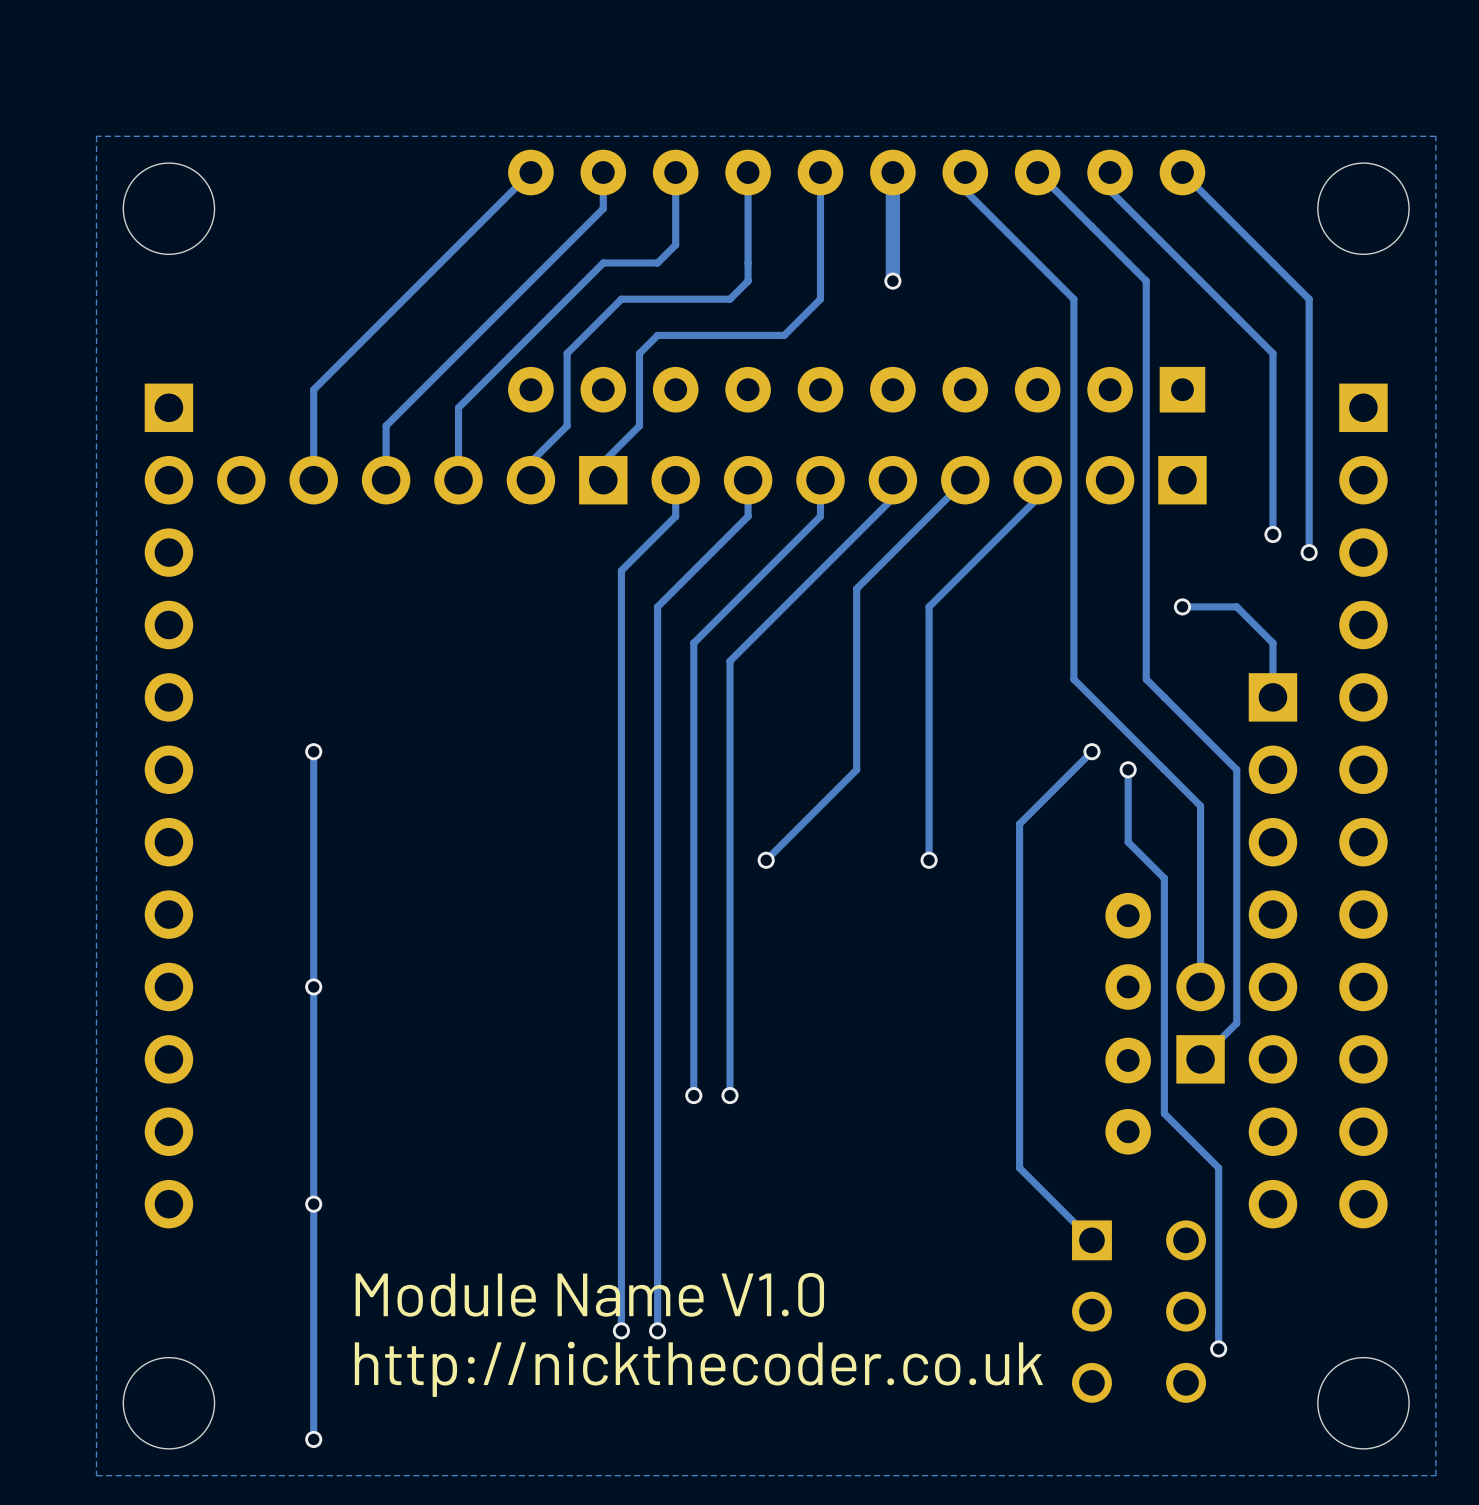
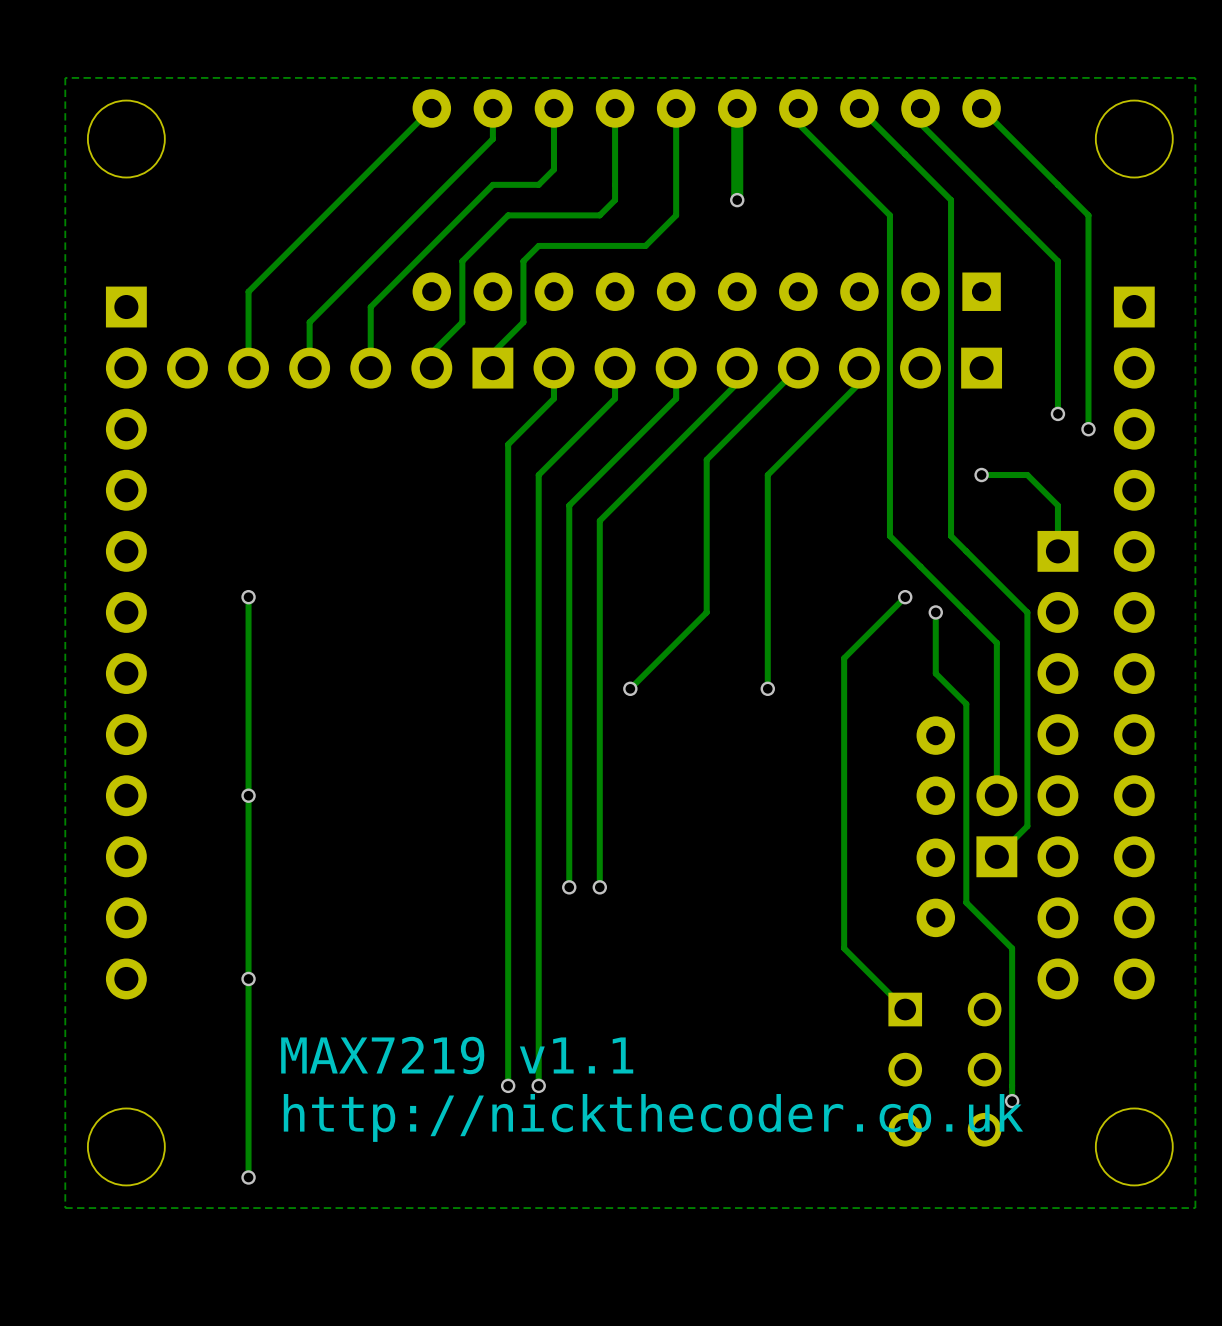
text: Module Name V1.0 (589, 1294) -> MAX7219 v1.1 (457, 1055)

